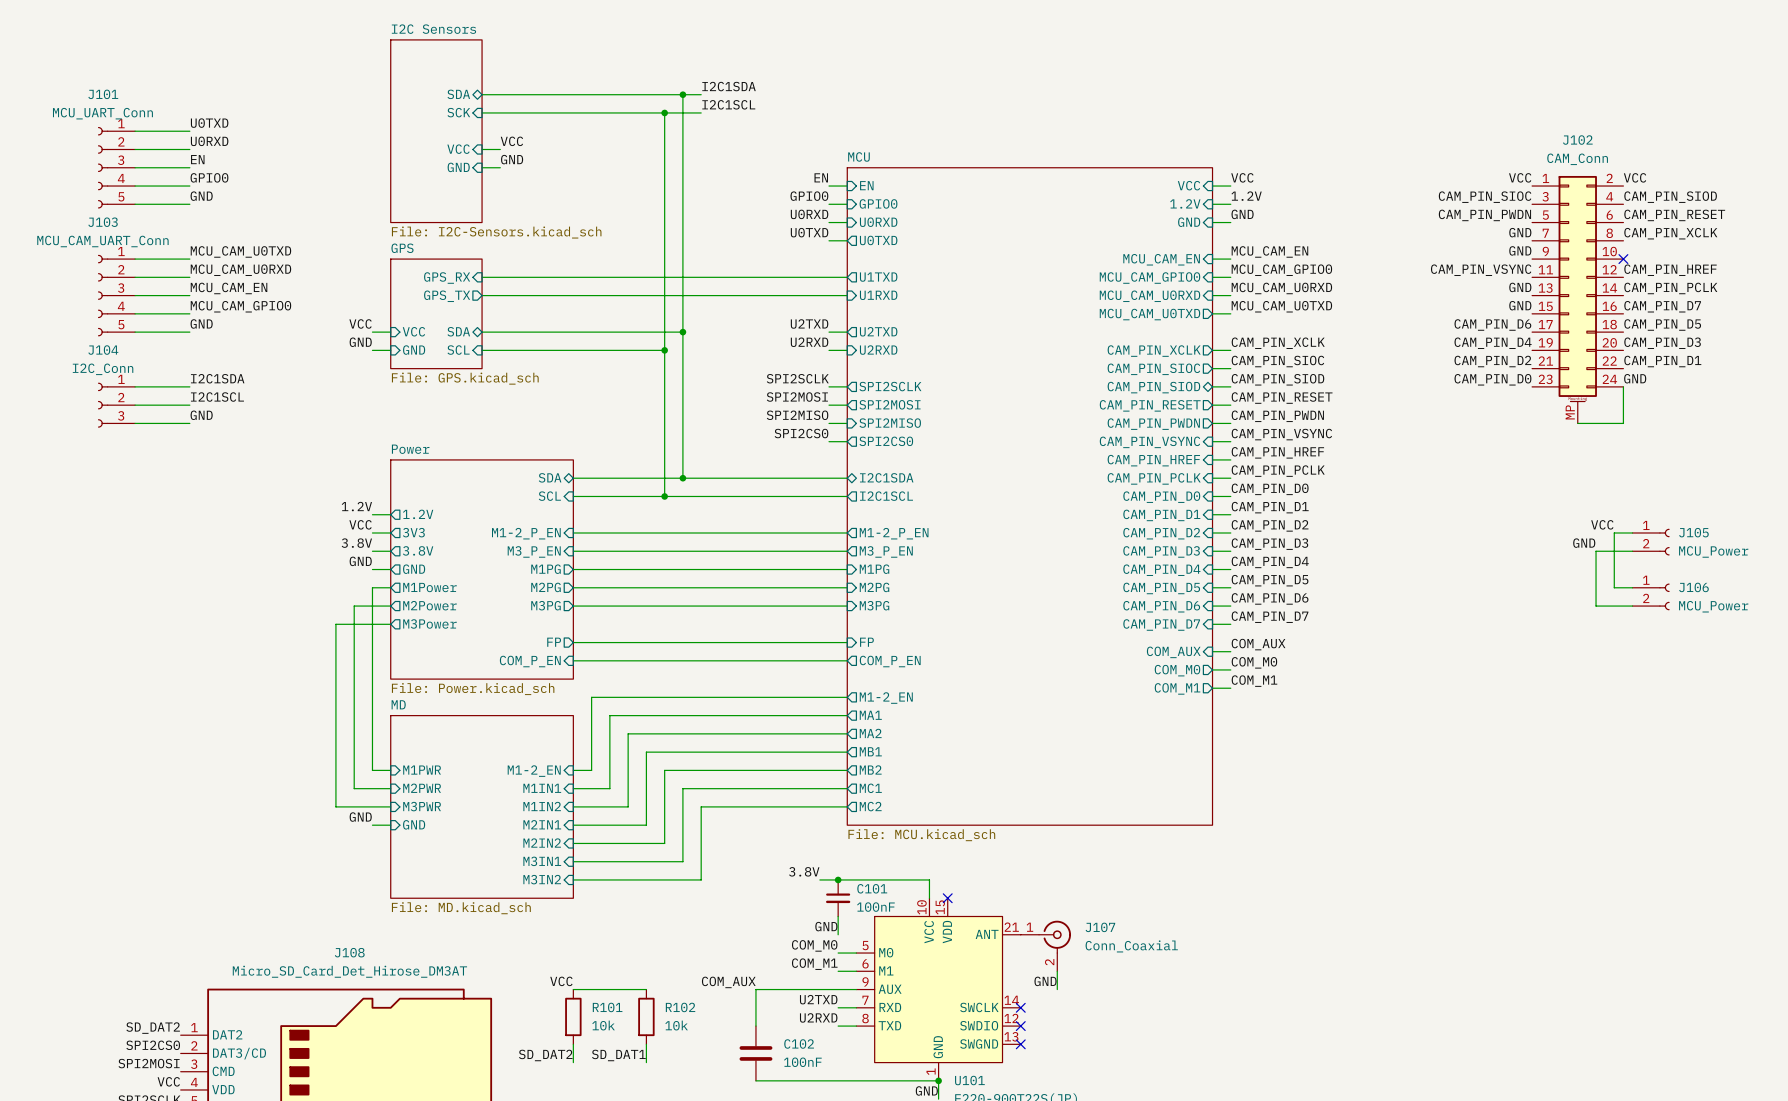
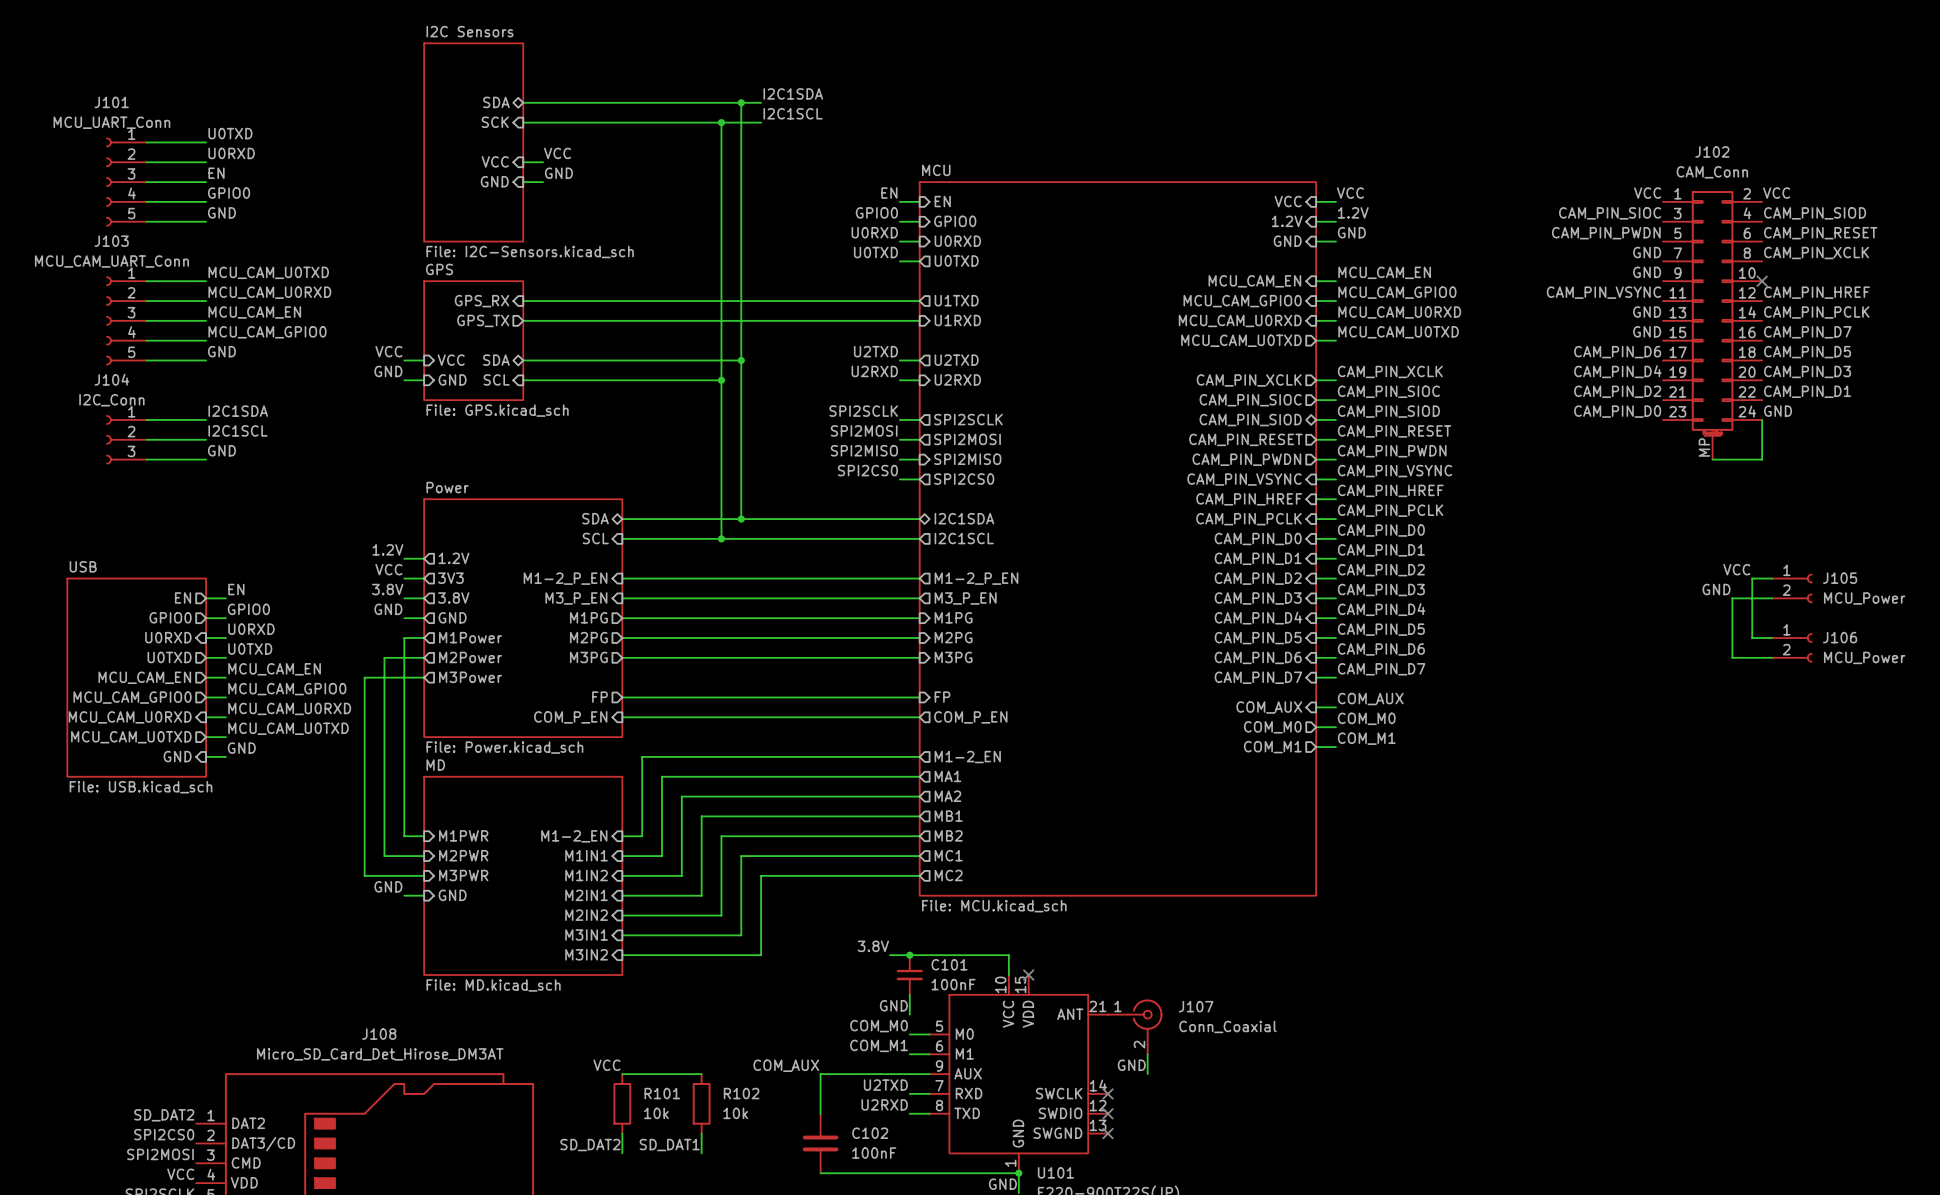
label: none -> EN (236, 589)
sheet pin: none -> EN (183, 597)
wire: none -> (206, 598) (225, 598)
label: none -> GPIO0 (248, 609)
sheet pin: none -> GPIO0 (170, 617)
wire: none -> (206, 618) (225, 618)
label: none -> U0RXD (251, 629)
sheet pin: none -> U0RXD (168, 637)
wire: none -> (206, 638) (225, 638)
label: none -> U0TXD (250, 648)
sheet pin: none -> U0TXD (169, 657)
wire: none -> (206, 657) (225, 657)
label: none -> MCU_CAM_EN (274, 669)
sheet USB: none -> File: USB.kicad_sch (136, 677)
sheet pin: none -> MCU_CAM_EN (144, 677)
wire: none -> (206, 677) (225, 677)
label: none -> MCU_CAM_GPIO0 (287, 689)
wire: none -> (206, 697) (225, 697)
sheet pin: none -> MCU_CAM_GPIO0 (132, 697)
label: none -> MCU_CAM_U0RXD (289, 708)
wire: none -> (206, 717) (225, 717)
sheet pin: none -> MCU_CAM_U0RXD (130, 717)
label: none -> MCU_CAM_U0TXD (288, 728)
sheet pin: none -> MCU_CAM_U0TXD (131, 737)
wire: none -> (206, 737) (225, 737)
label: none -> GND (241, 748)
sheet pin: none -> GND (177, 756)
wire: none -> (206, 756) (225, 756)

